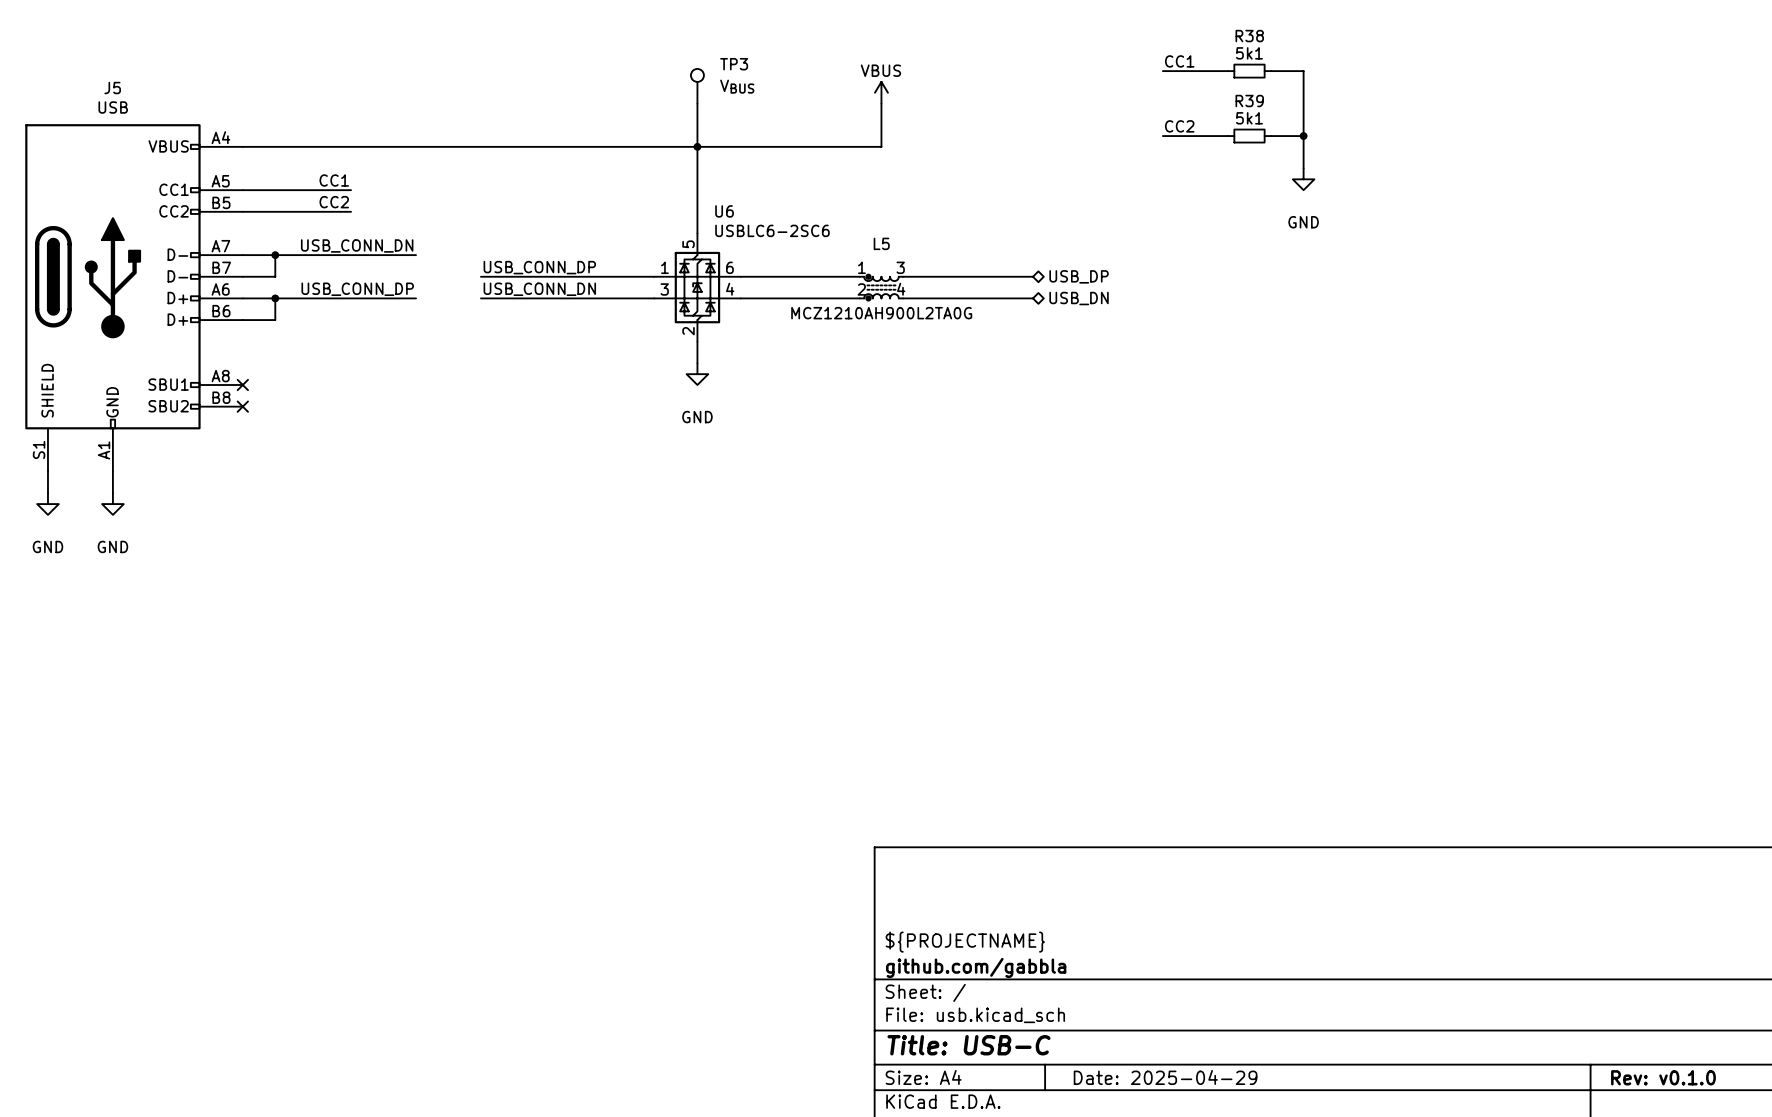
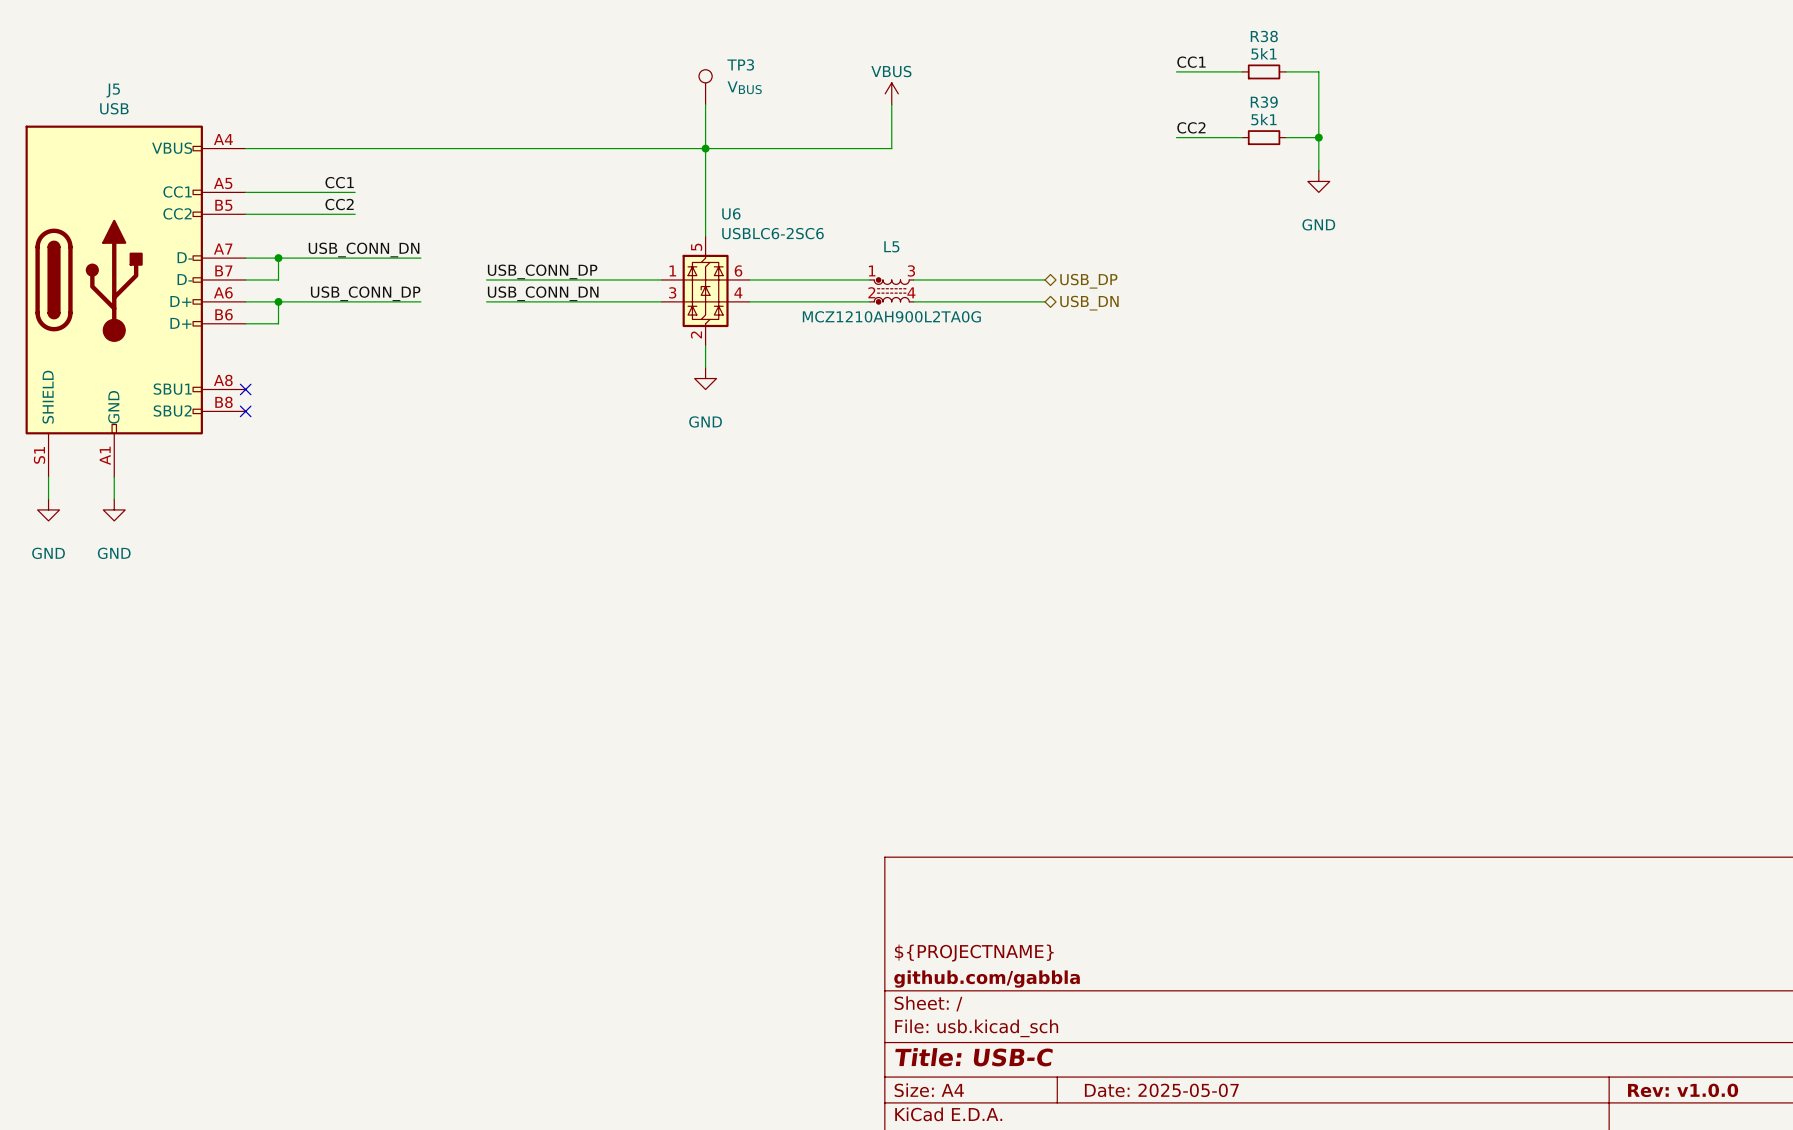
title block: Date: 2025-04-29 (1165, 1077) -> Date: 2025-05-07 (1161, 1090)
title block: Rev: v0.1.0 (1663, 1077) -> Rev: v1.0.0 (1683, 1090)

